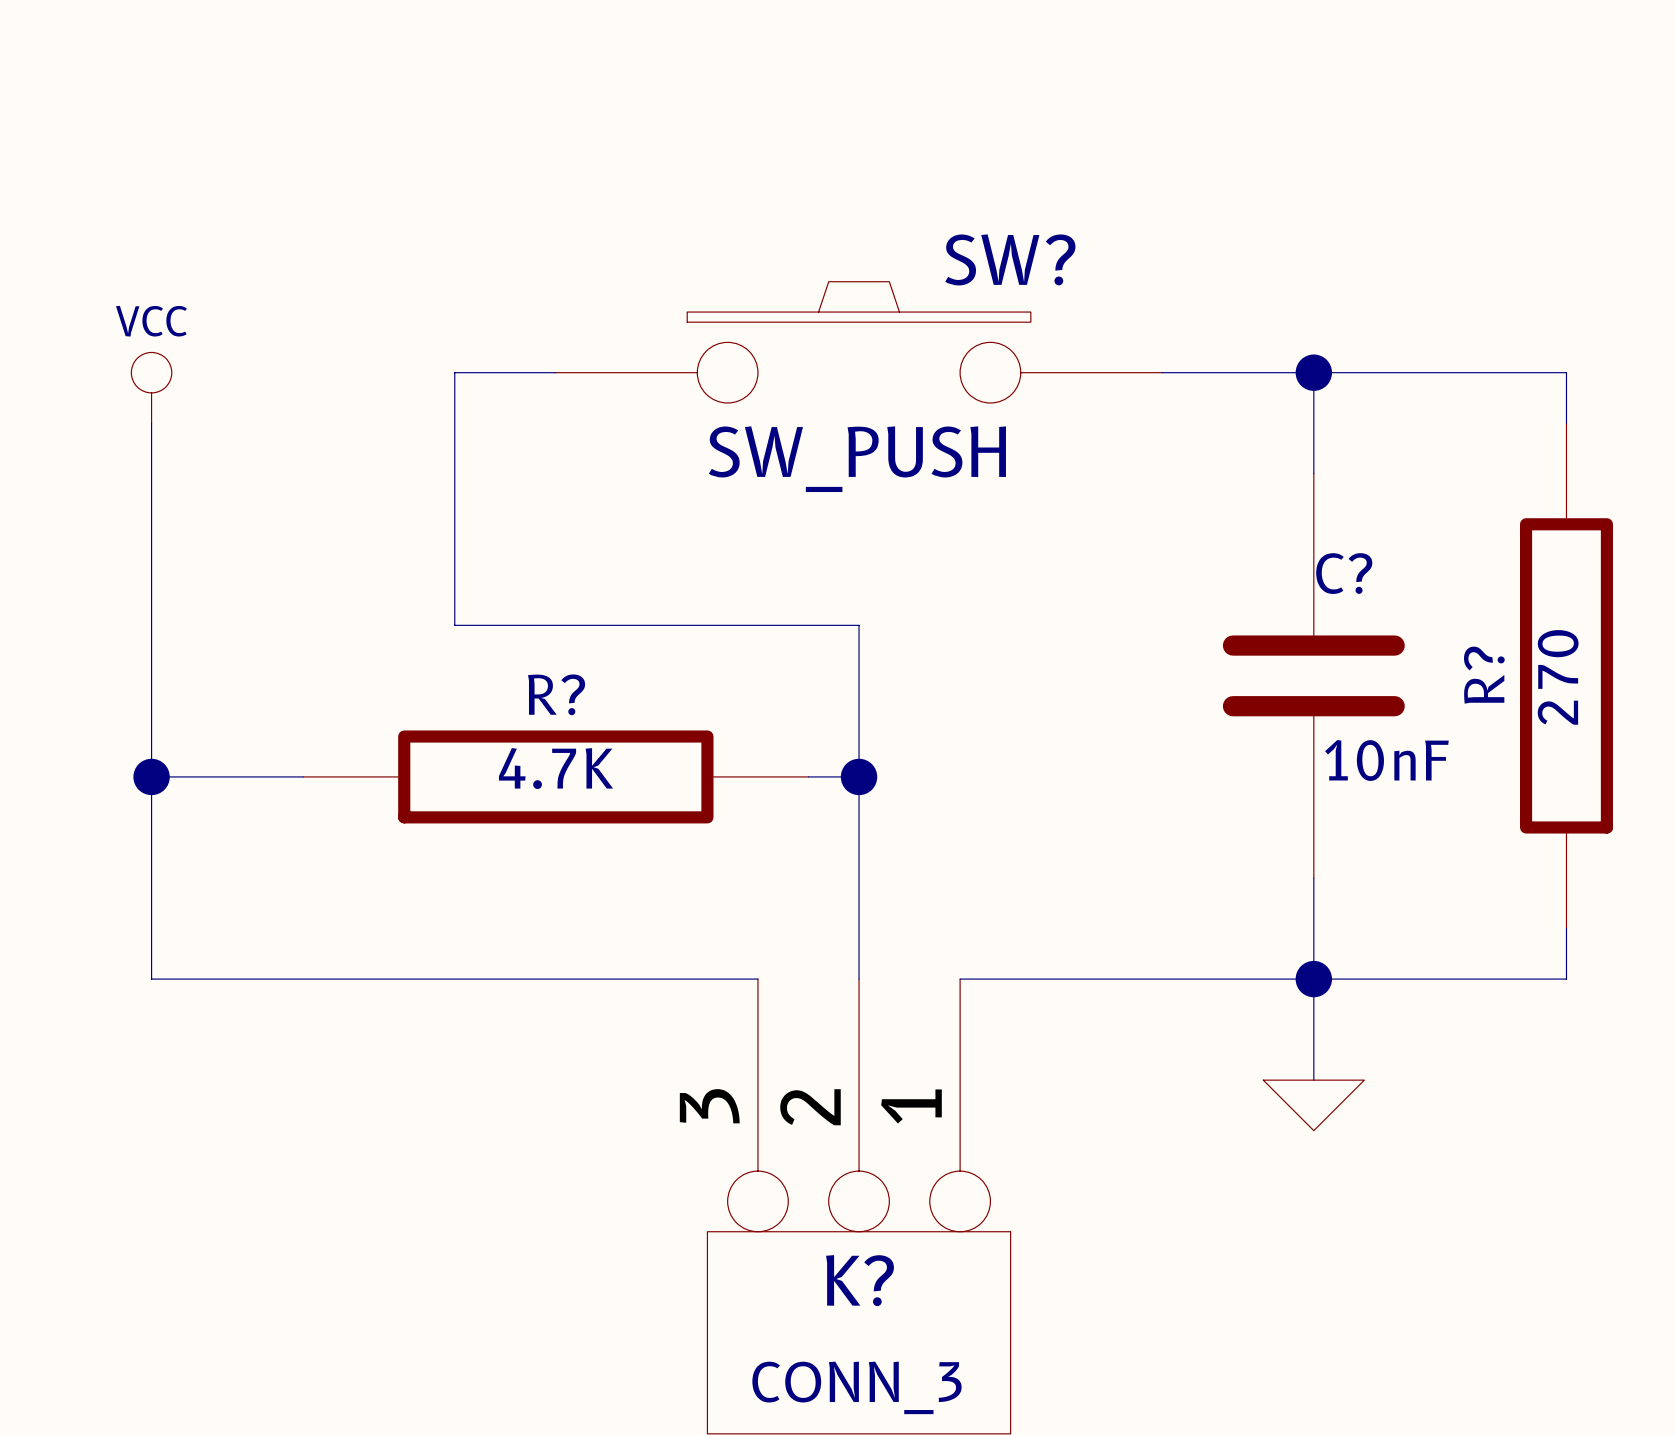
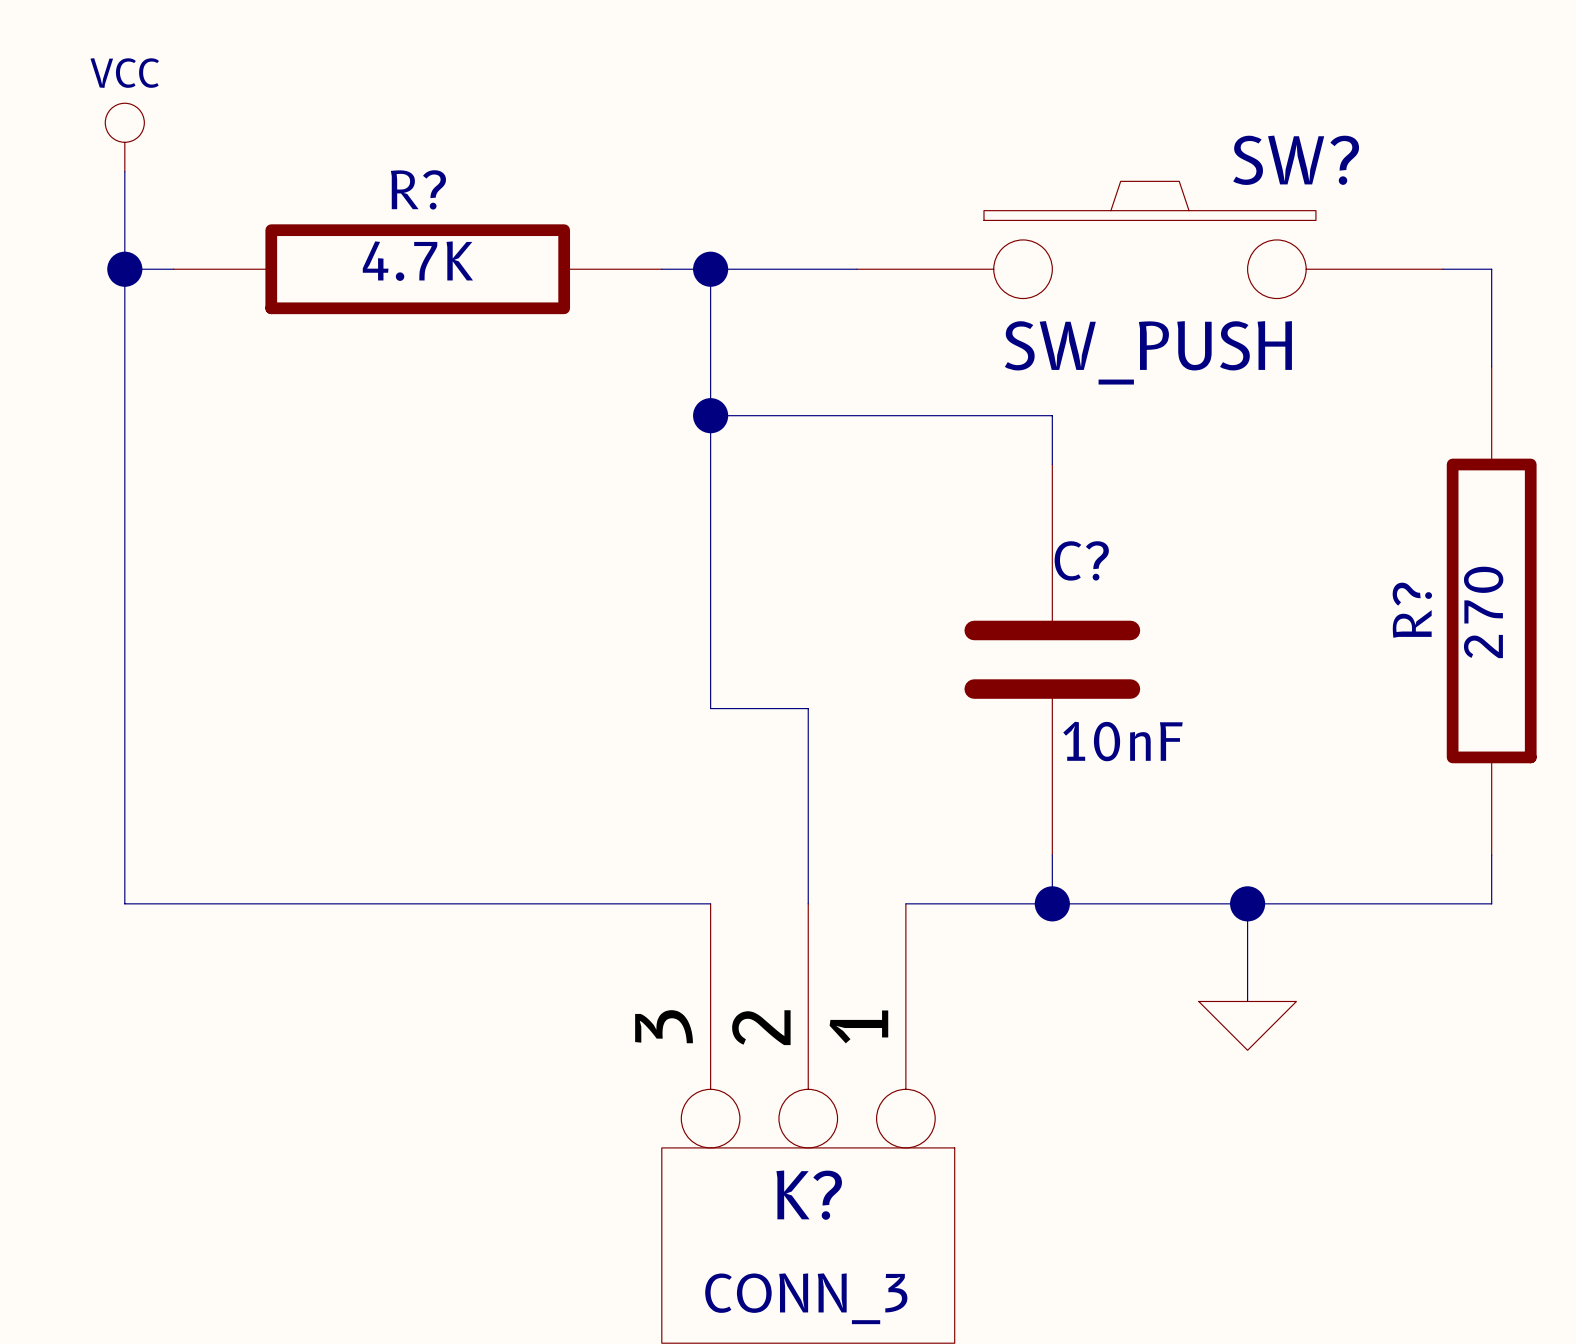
wire: none -> (124, 171) (124, 366)
wire: none -> (124, 269) (173, 269)
junction: none -> (124, 269)
wire: none -> (710, 269) (710, 708) (759, 708)
junction: none -> (710, 269)
SW? position: (859, 342) -> (1149, 239)
wire: (555, 372) (454, 372) (454, 625) (859, 625) (859, 776) -> none
wire: (1162, 372) (1566, 372) -> (1442, 269) (1491, 269) (1491, 318)
wire: (1313, 372) (1313, 473) -> none
junction: (1313, 372) -> none
power symbol position: VCC (151, 387) -> VCC (124, 137)
wire: none -> (710, 415) (1052, 415) (1052, 464)
junction: none -> (710, 415)
C? position: (1313, 675) -> (1052, 659)
wire: (151, 776) (303, 776) -> none
junction: (151, 776) -> none
R? position: (555, 776) -> (417, 269)
junction: (859, 776) -> none
wire: (1313, 878) (1313, 979) -> none
wire: none -> (1052, 855) (1052, 903)
junction: none -> (1052, 903)

